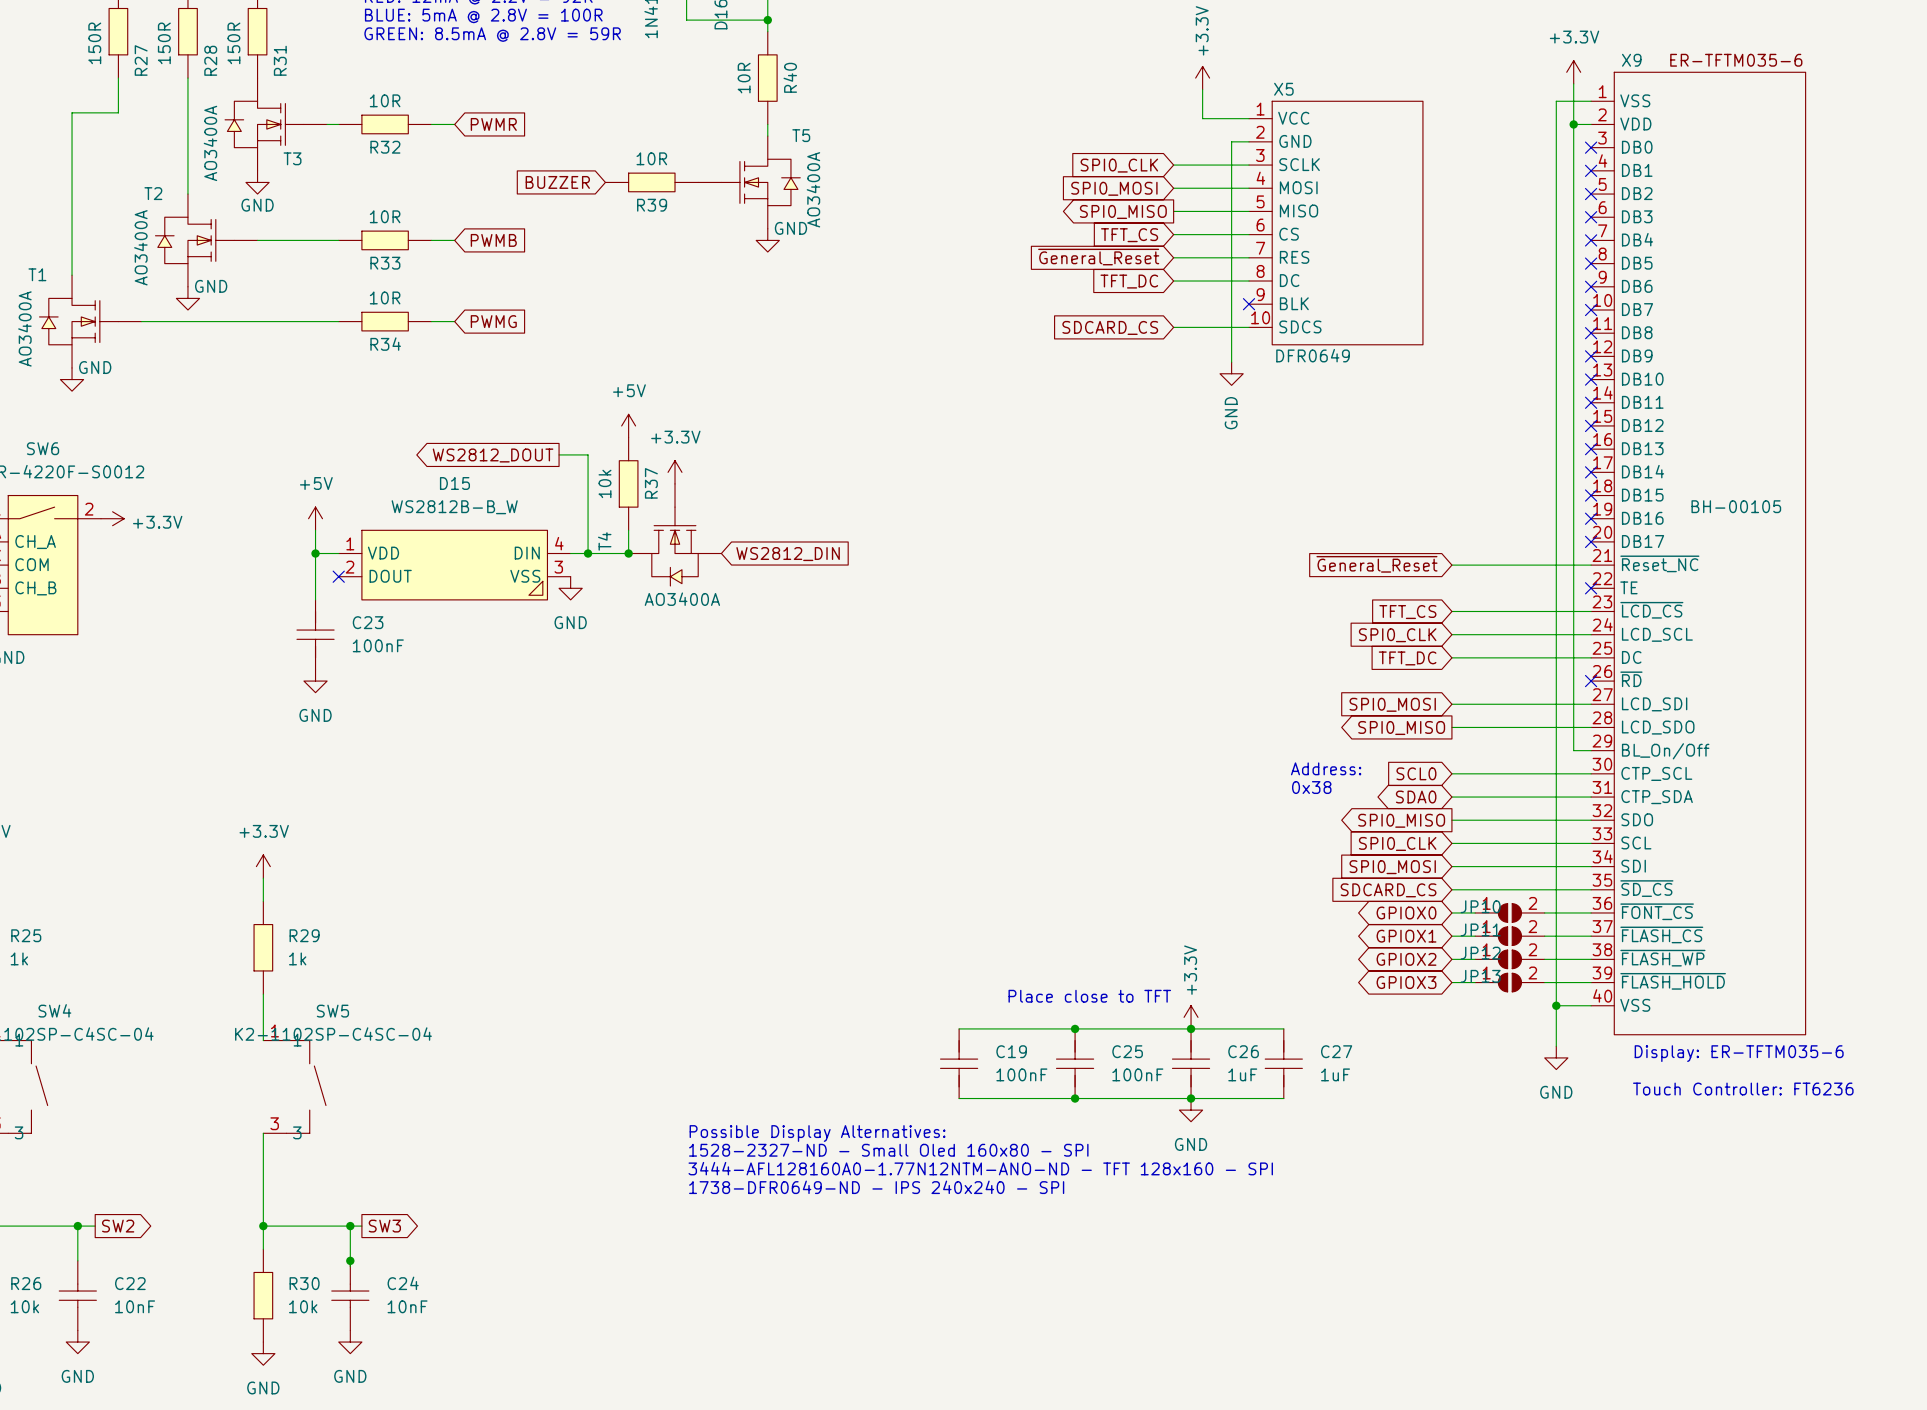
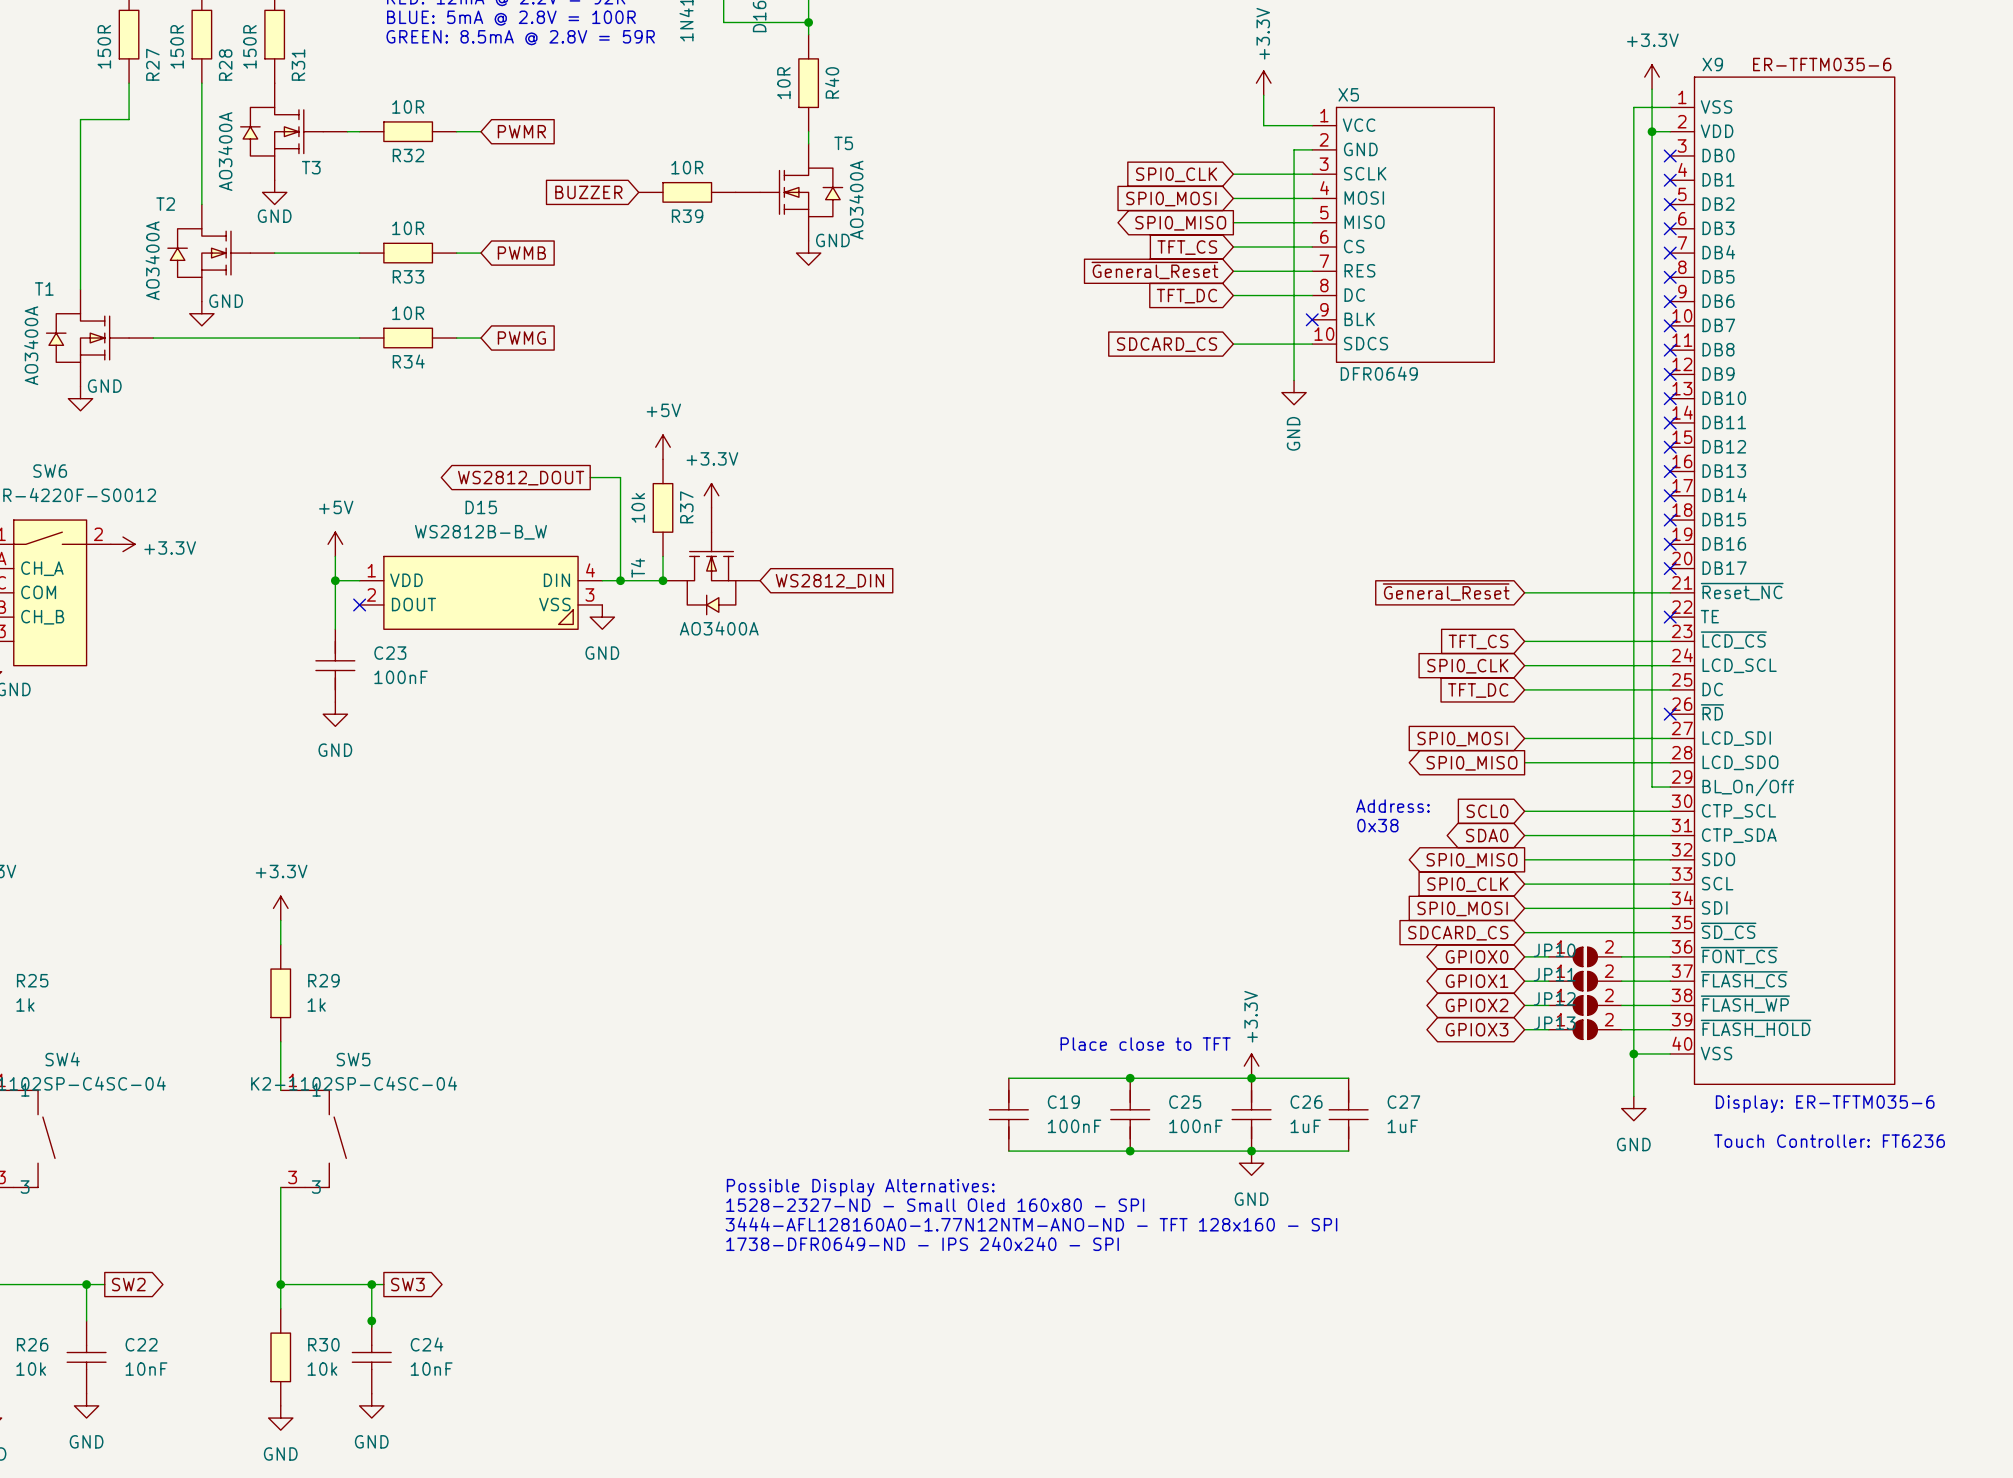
X9 value: BH-00105 (1736, 506) -> none

